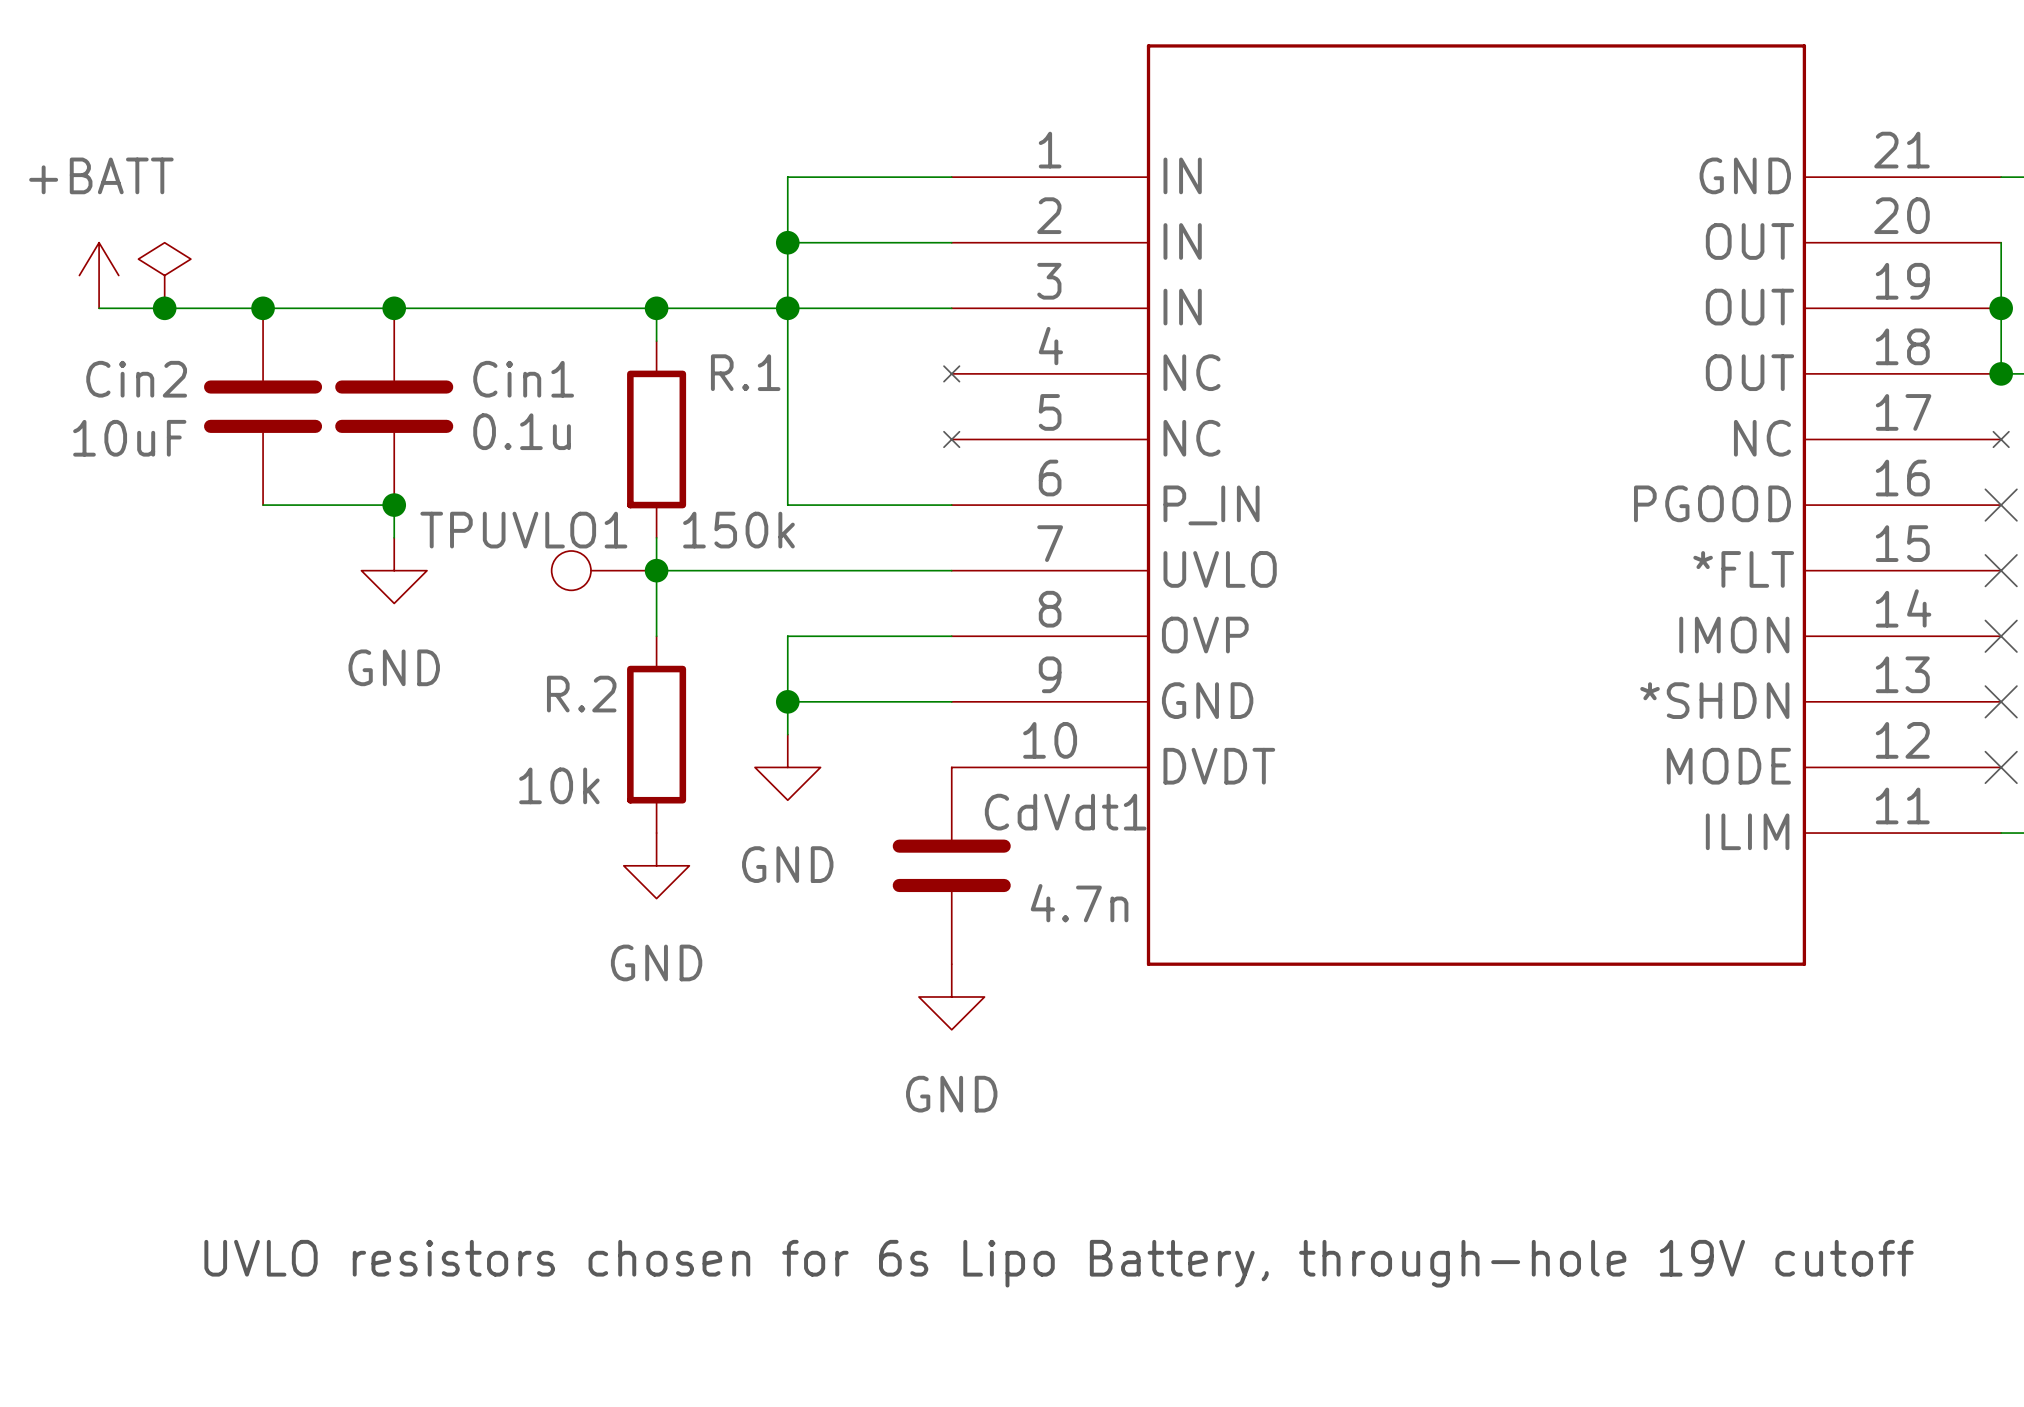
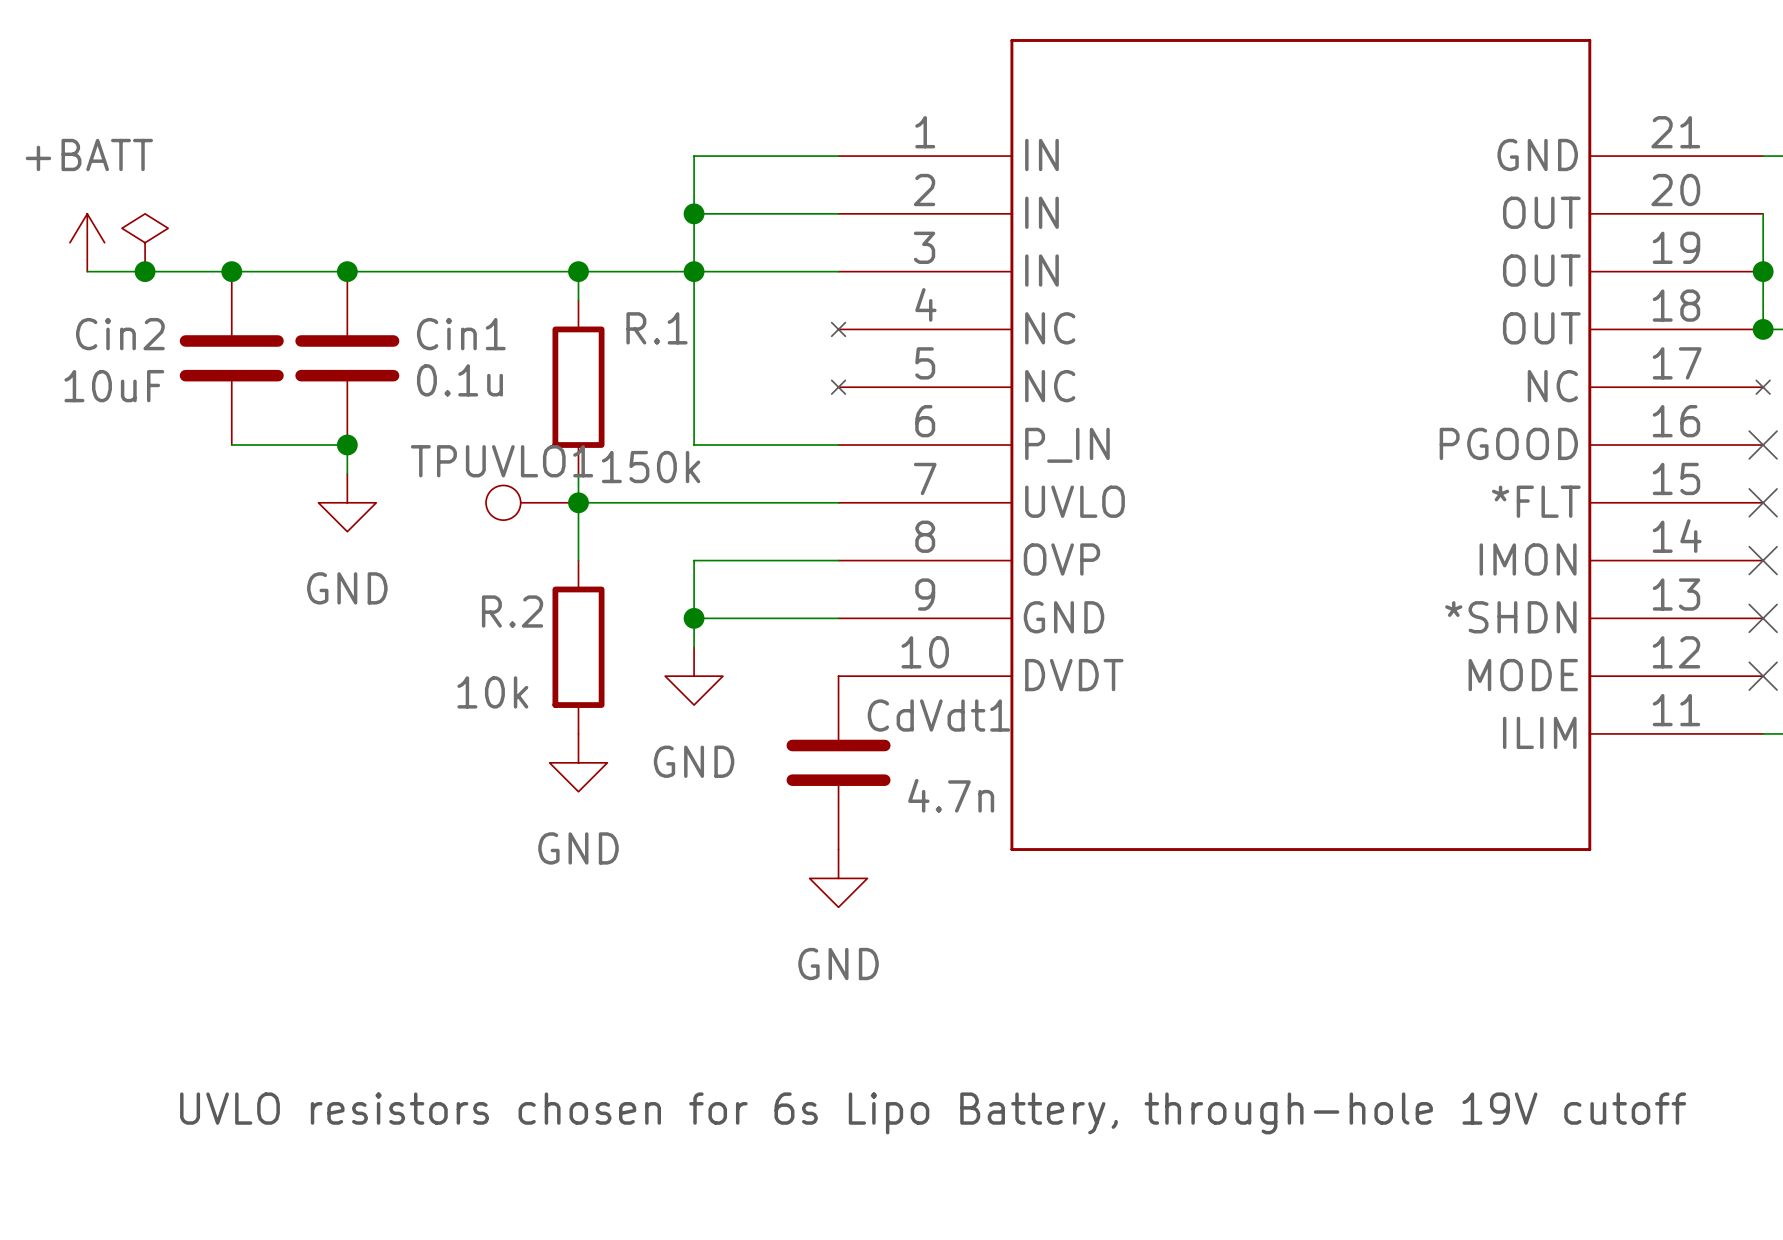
TPUVLO1 name position: TPUVLO1 (523, 530) -> TPUVLO1 (501, 461)

